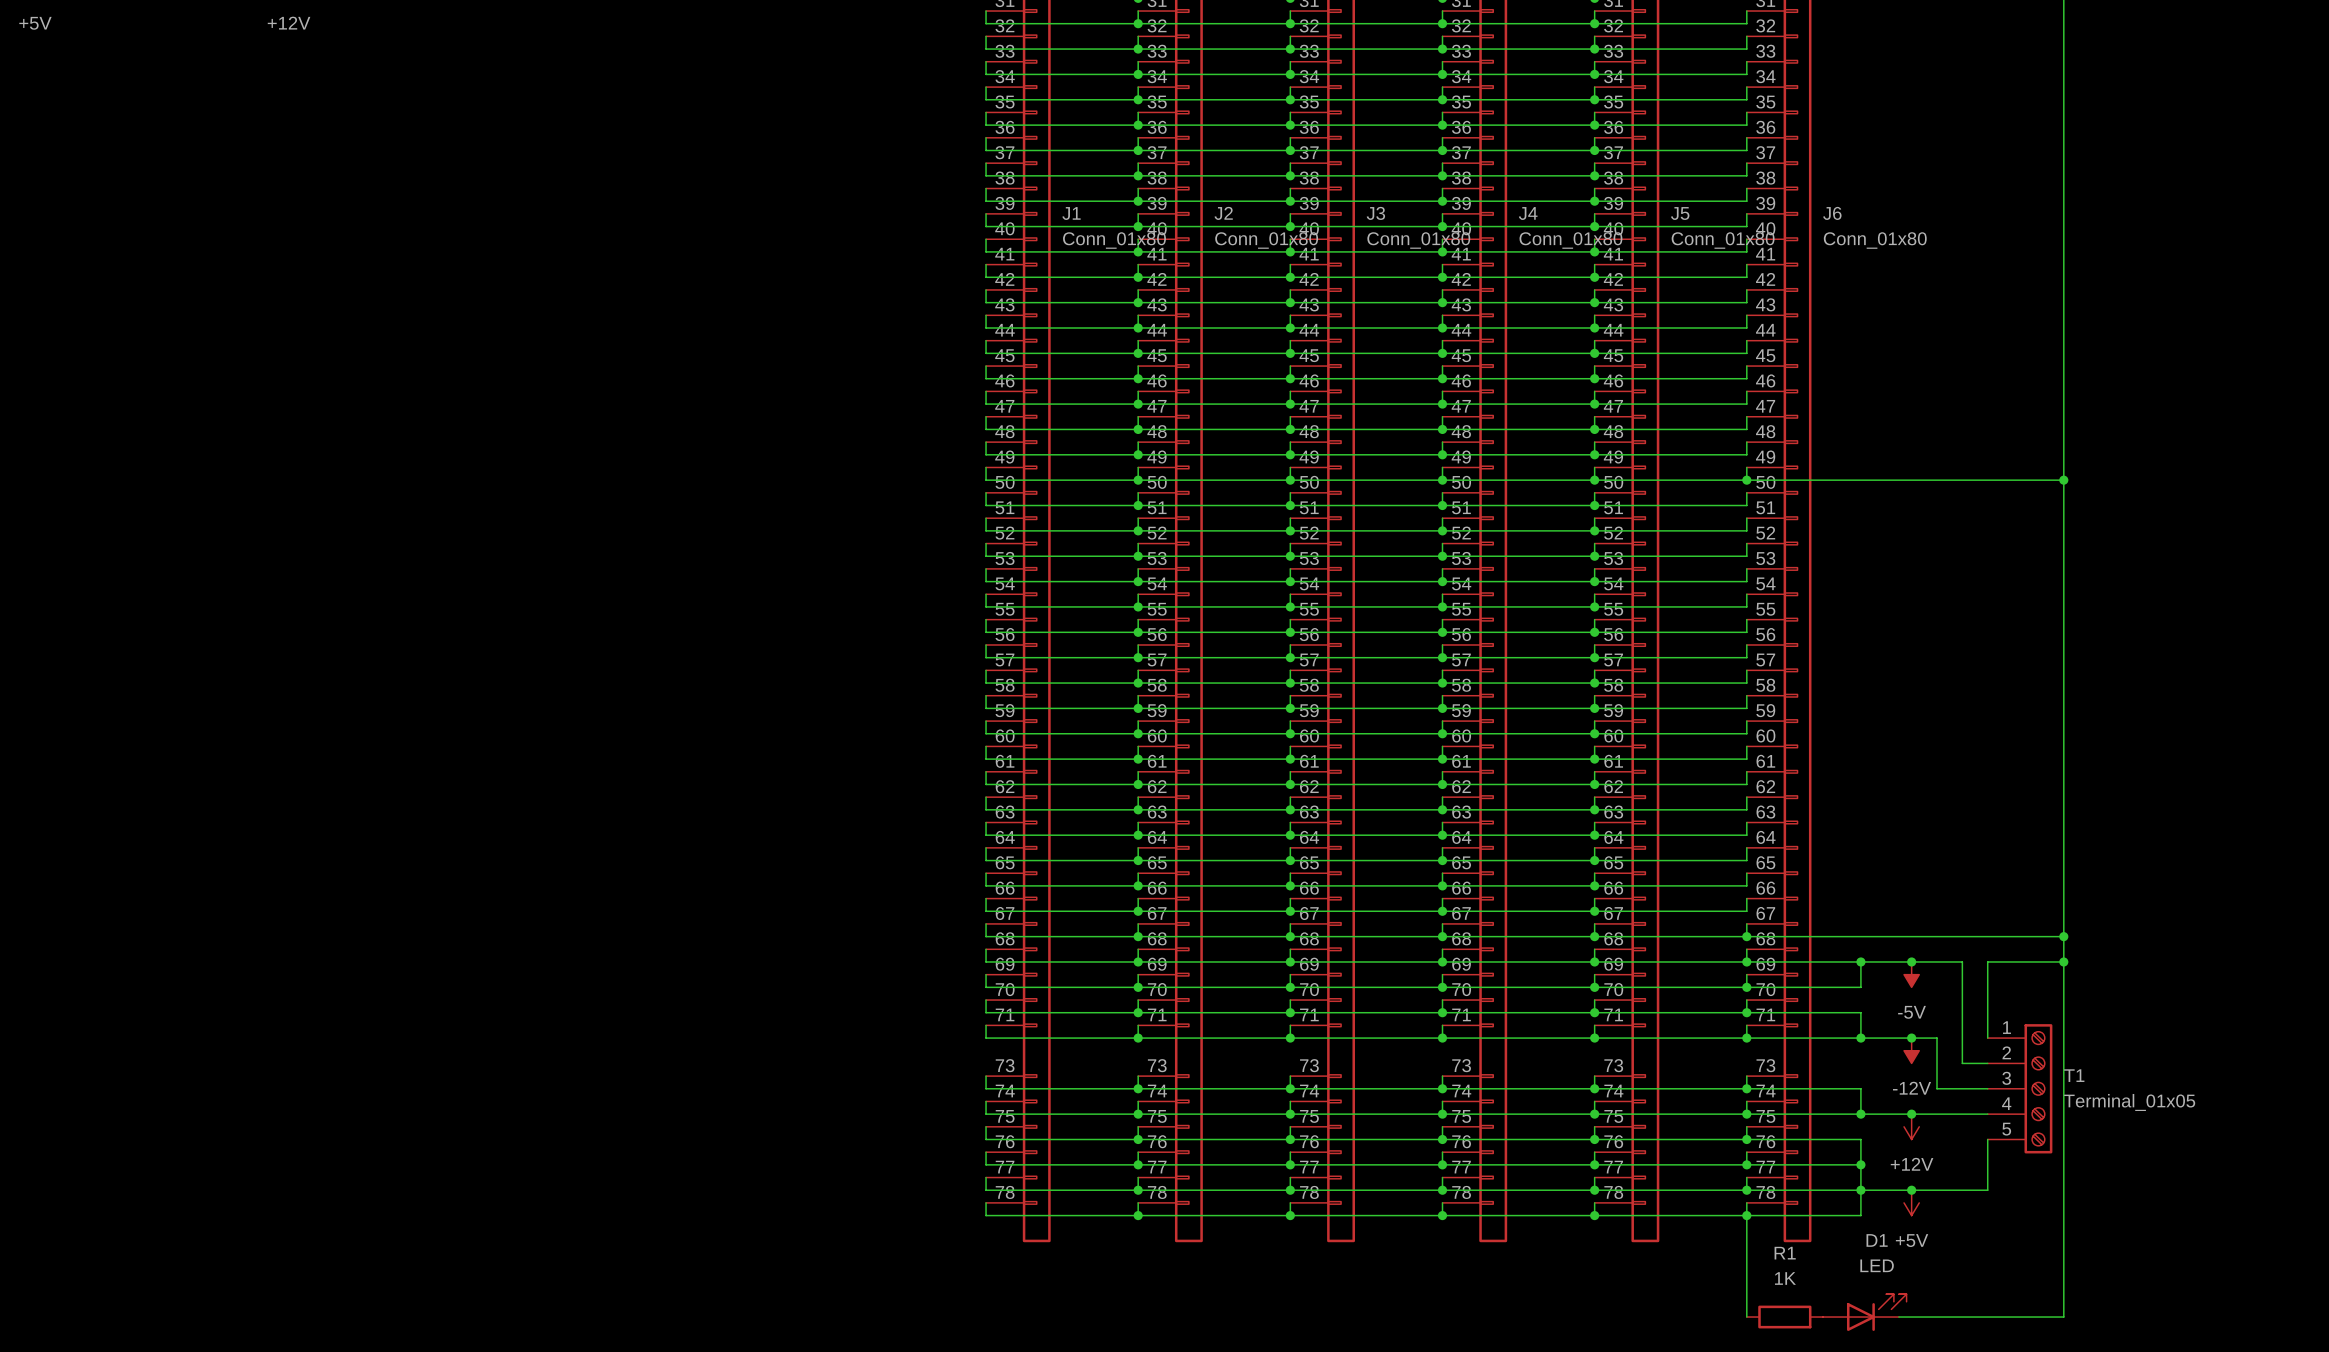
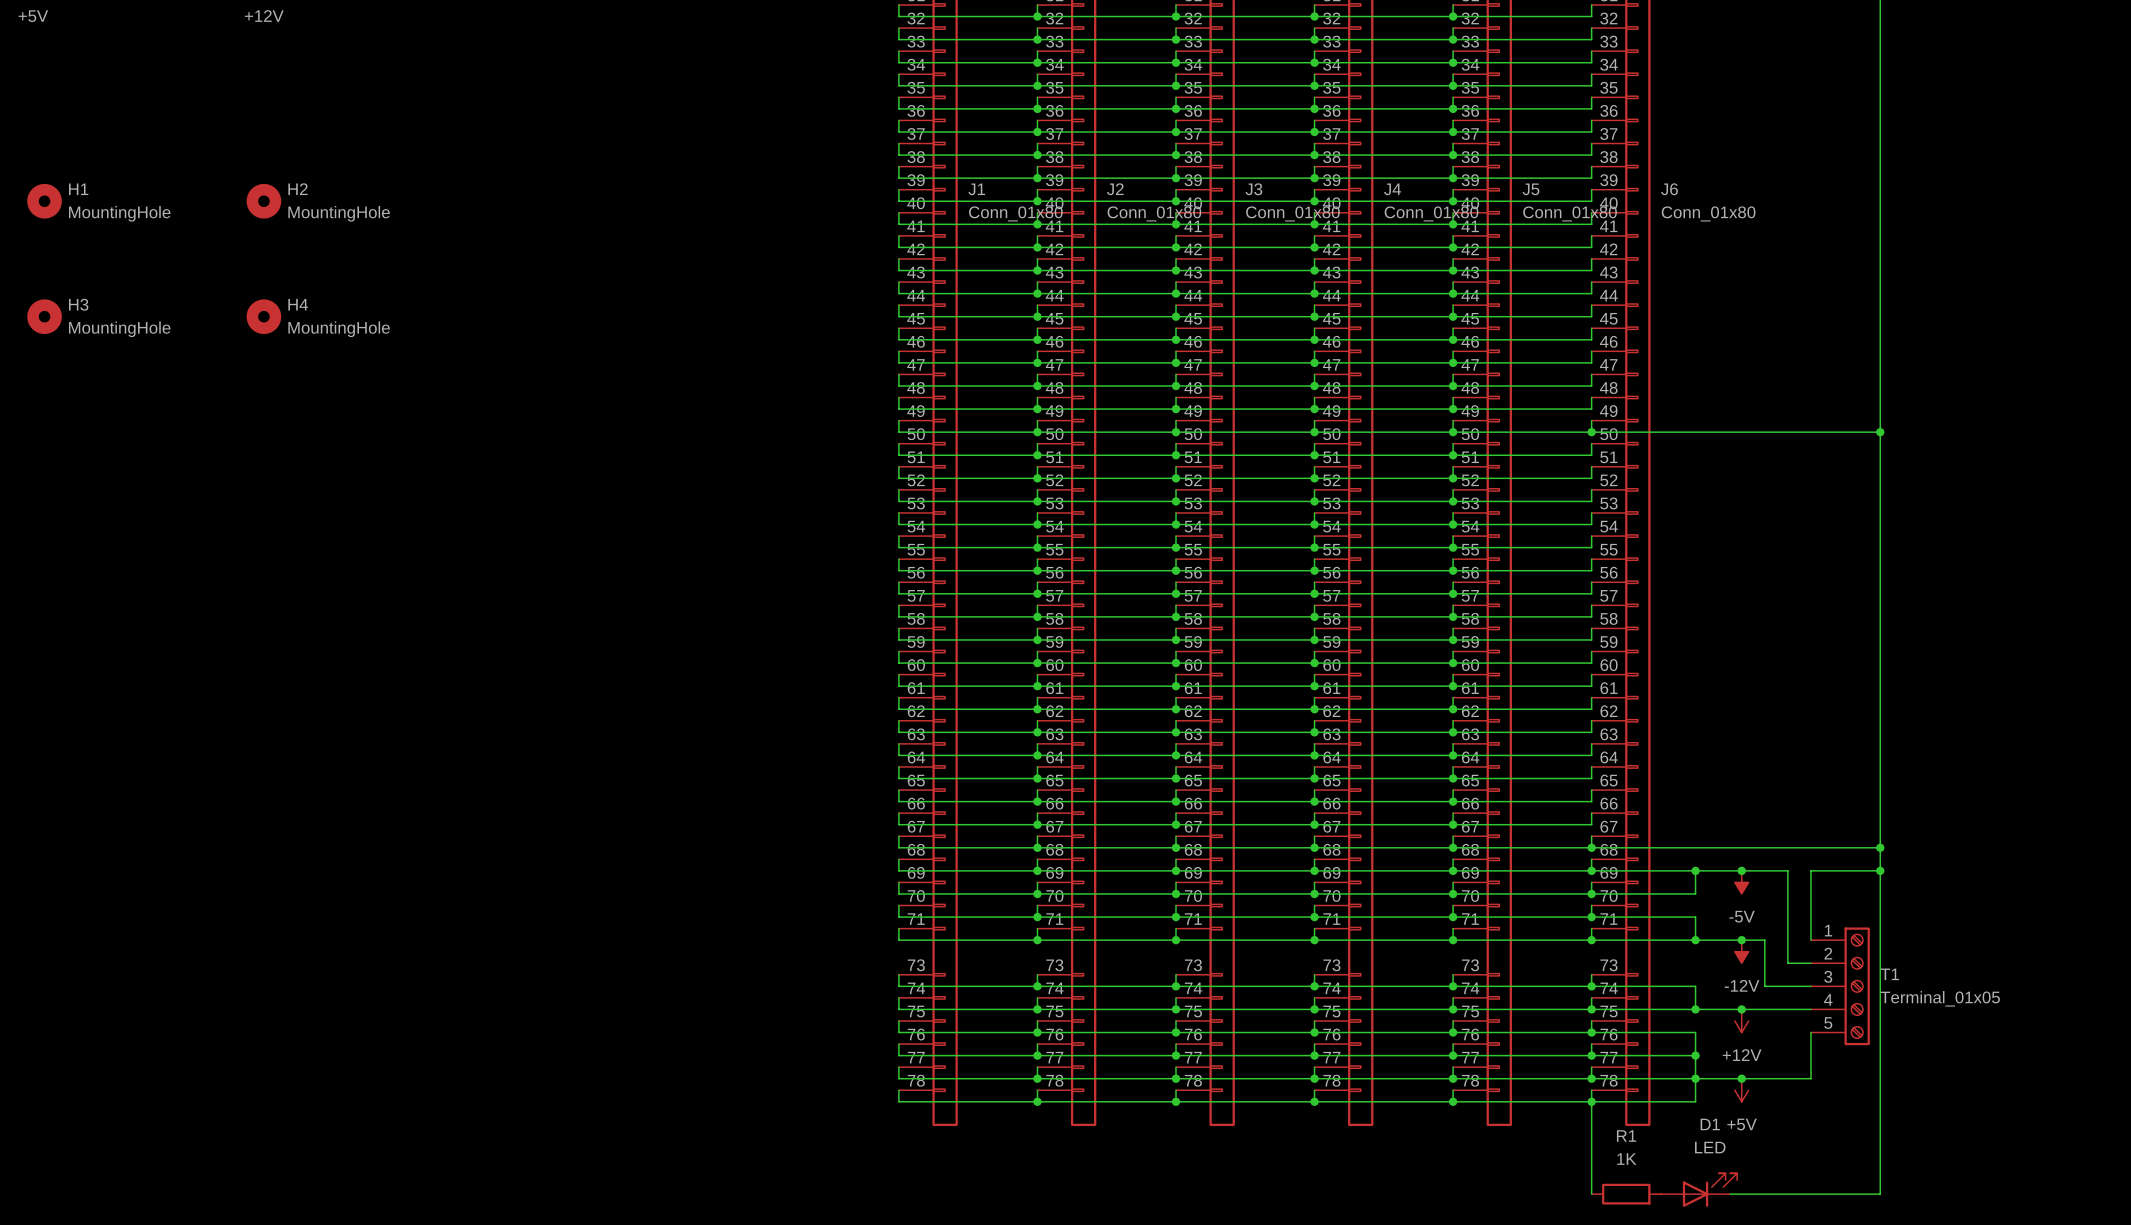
H1: none -> MountingHole (44, 201)
H2: none -> MountingHole (263, 201)
H3: none -> MountingHole (44, 316)
H4: none -> MountingHole (263, 316)

